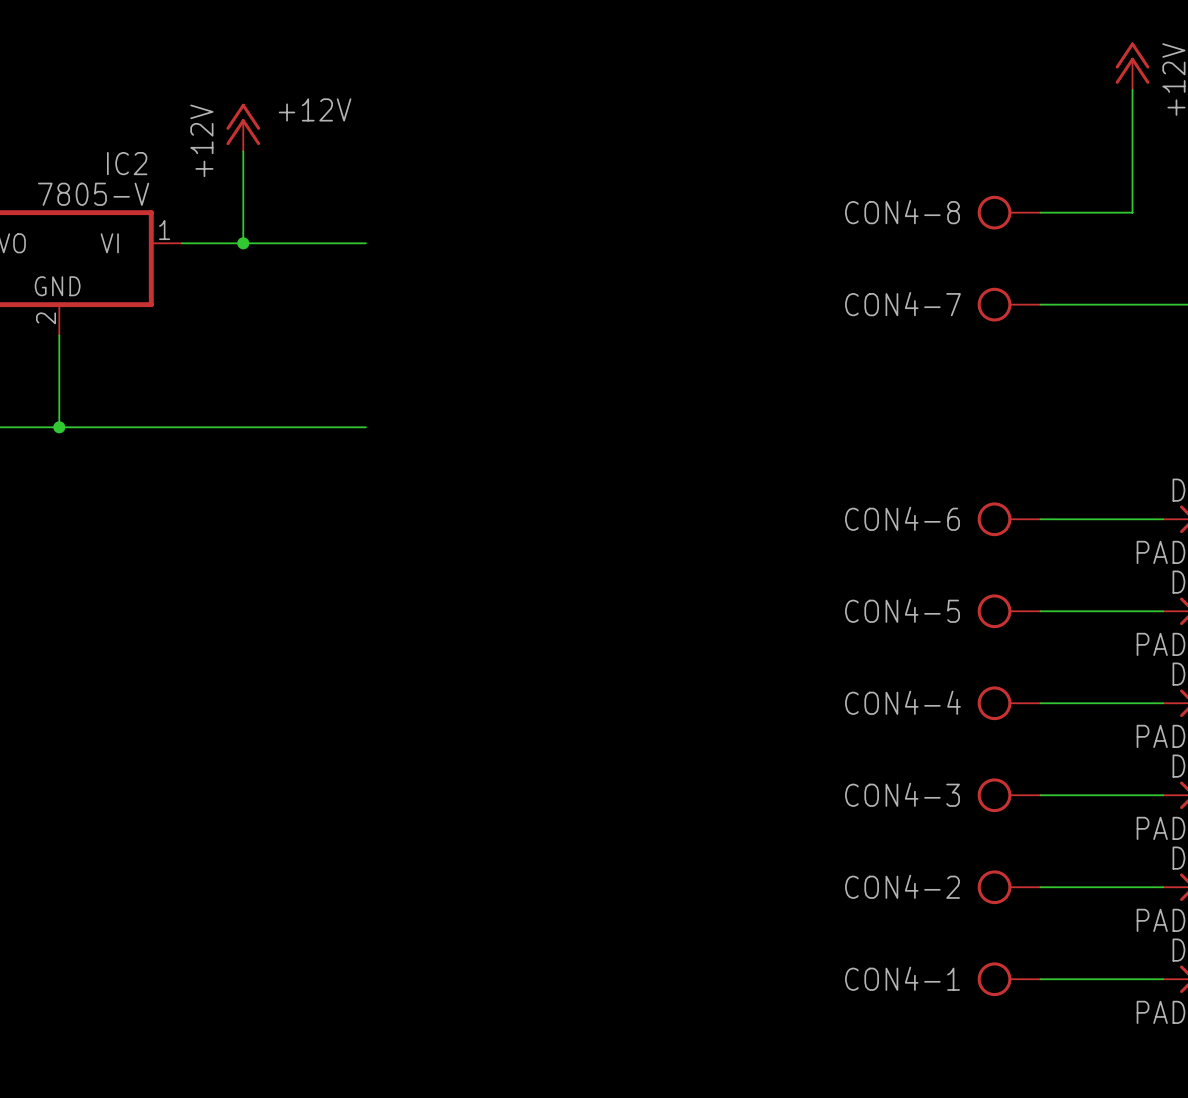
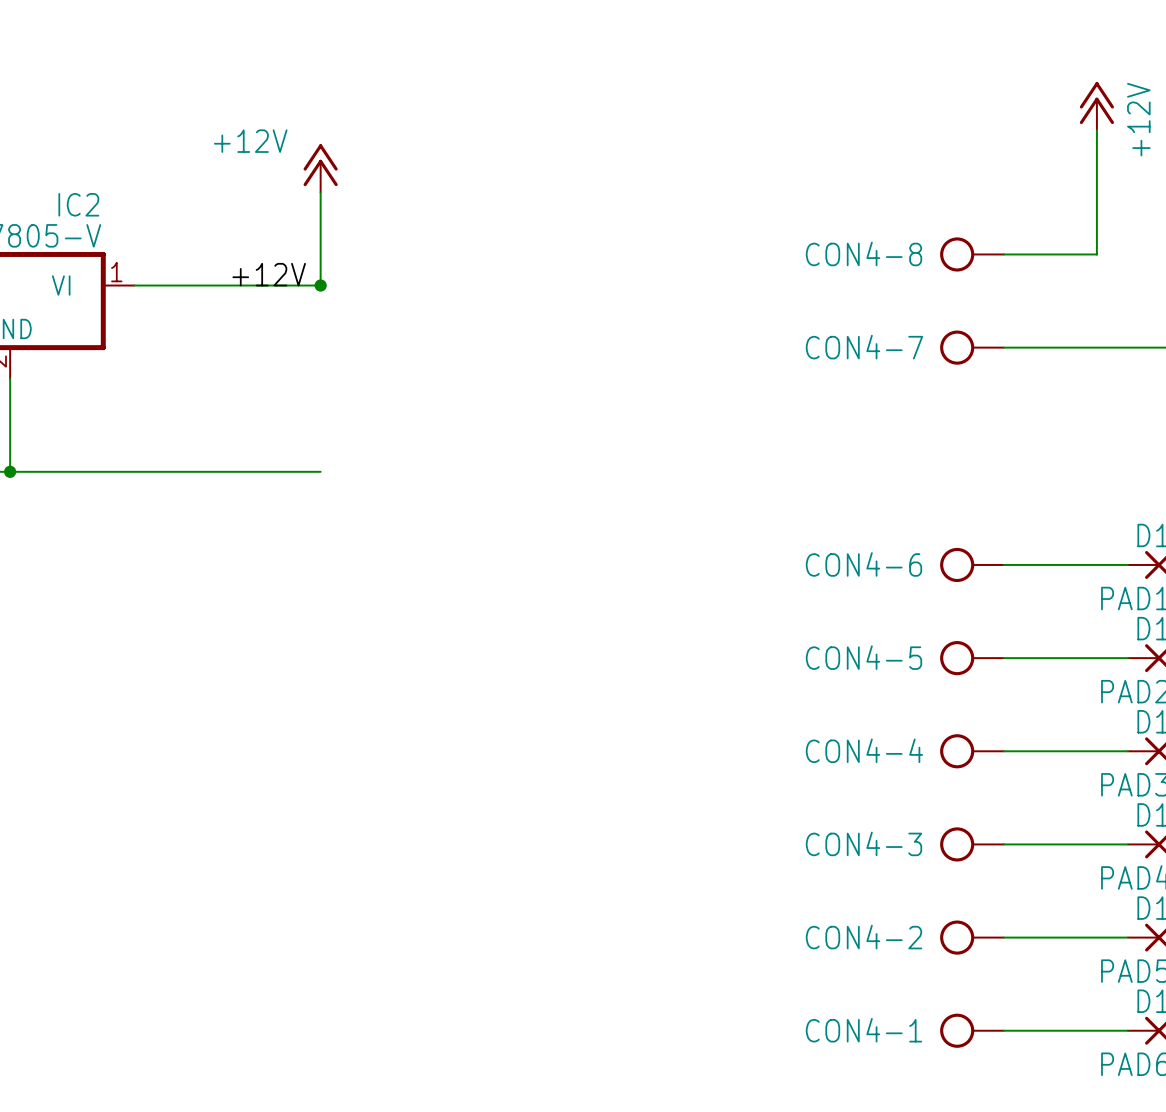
label position: +12V (315, 109) -> +12V (269, 274)
power symbol position: +12V (243, 127) -> +12V (320, 168)
power symbol text rotation: 0° (201, 140) -> 90° clockwise (250, 141)
wire: (243, 151) (243, 243) -> (320, 192) (320, 285)
junction: (243, 243) -> none
junction: none -> (320, 285)

